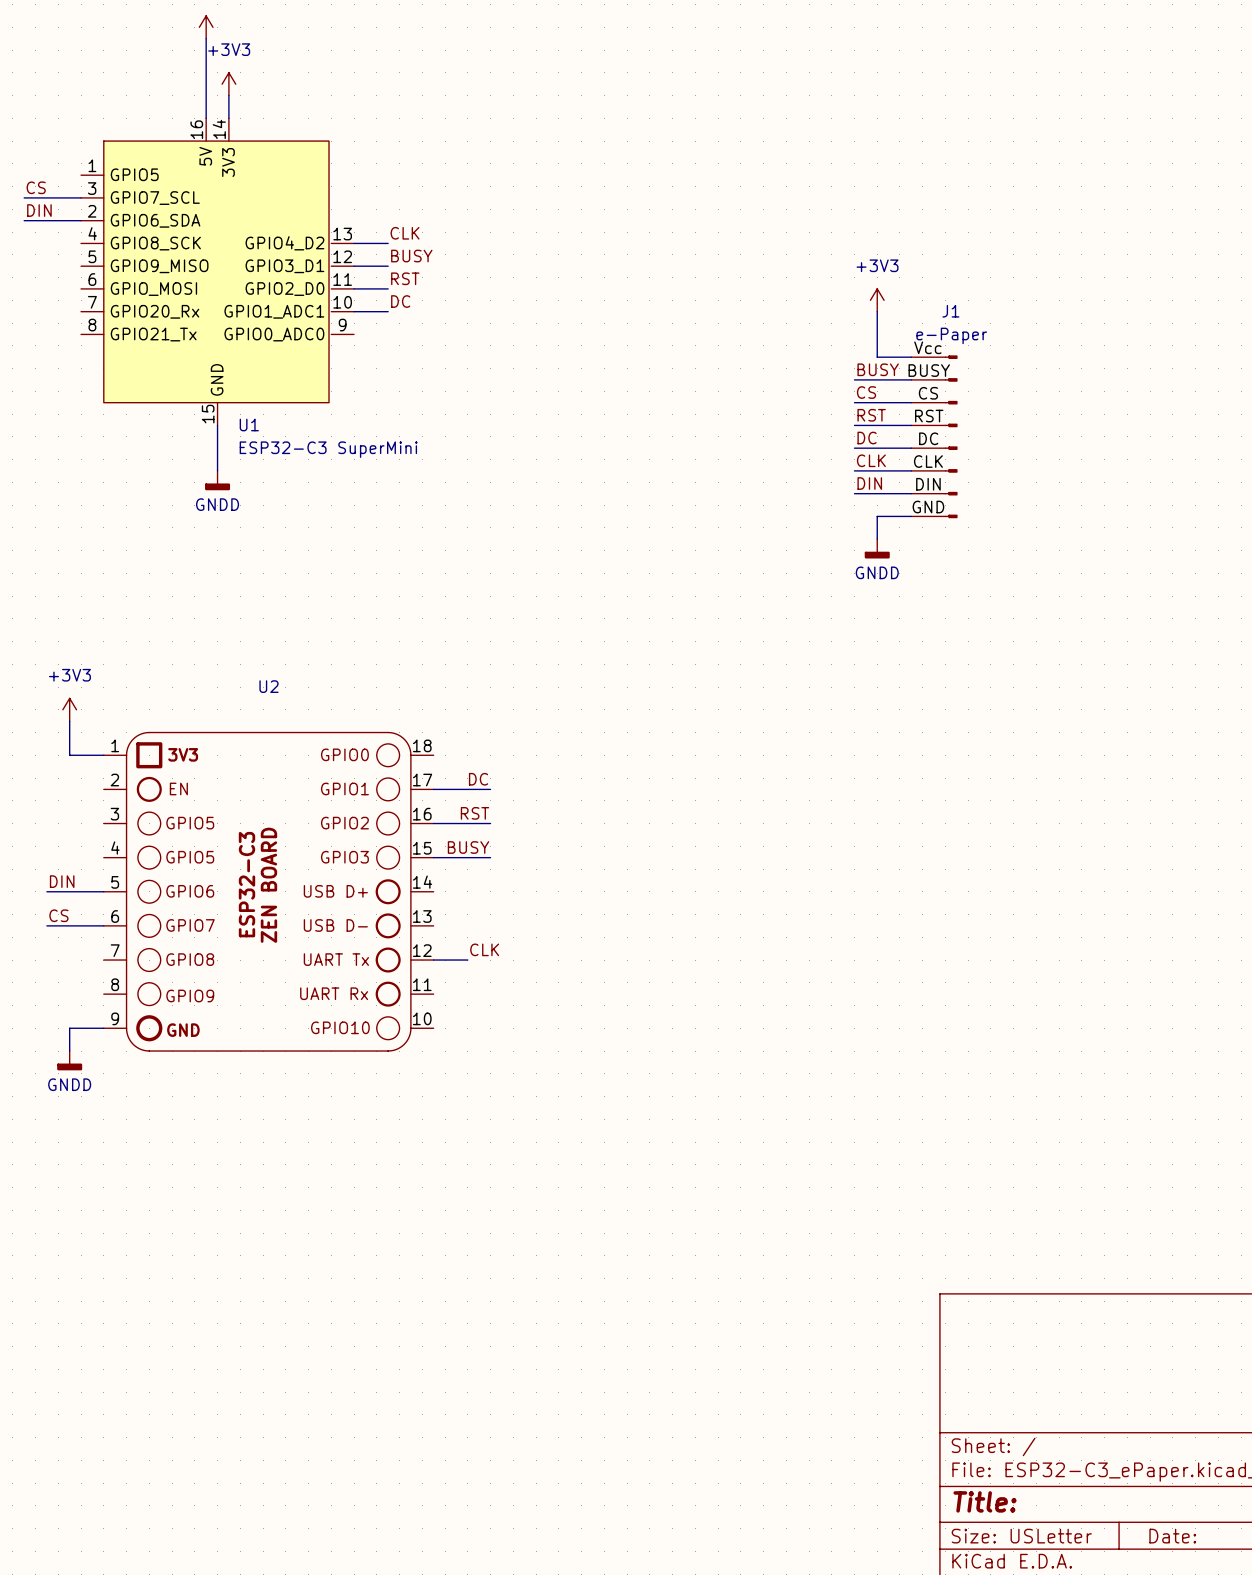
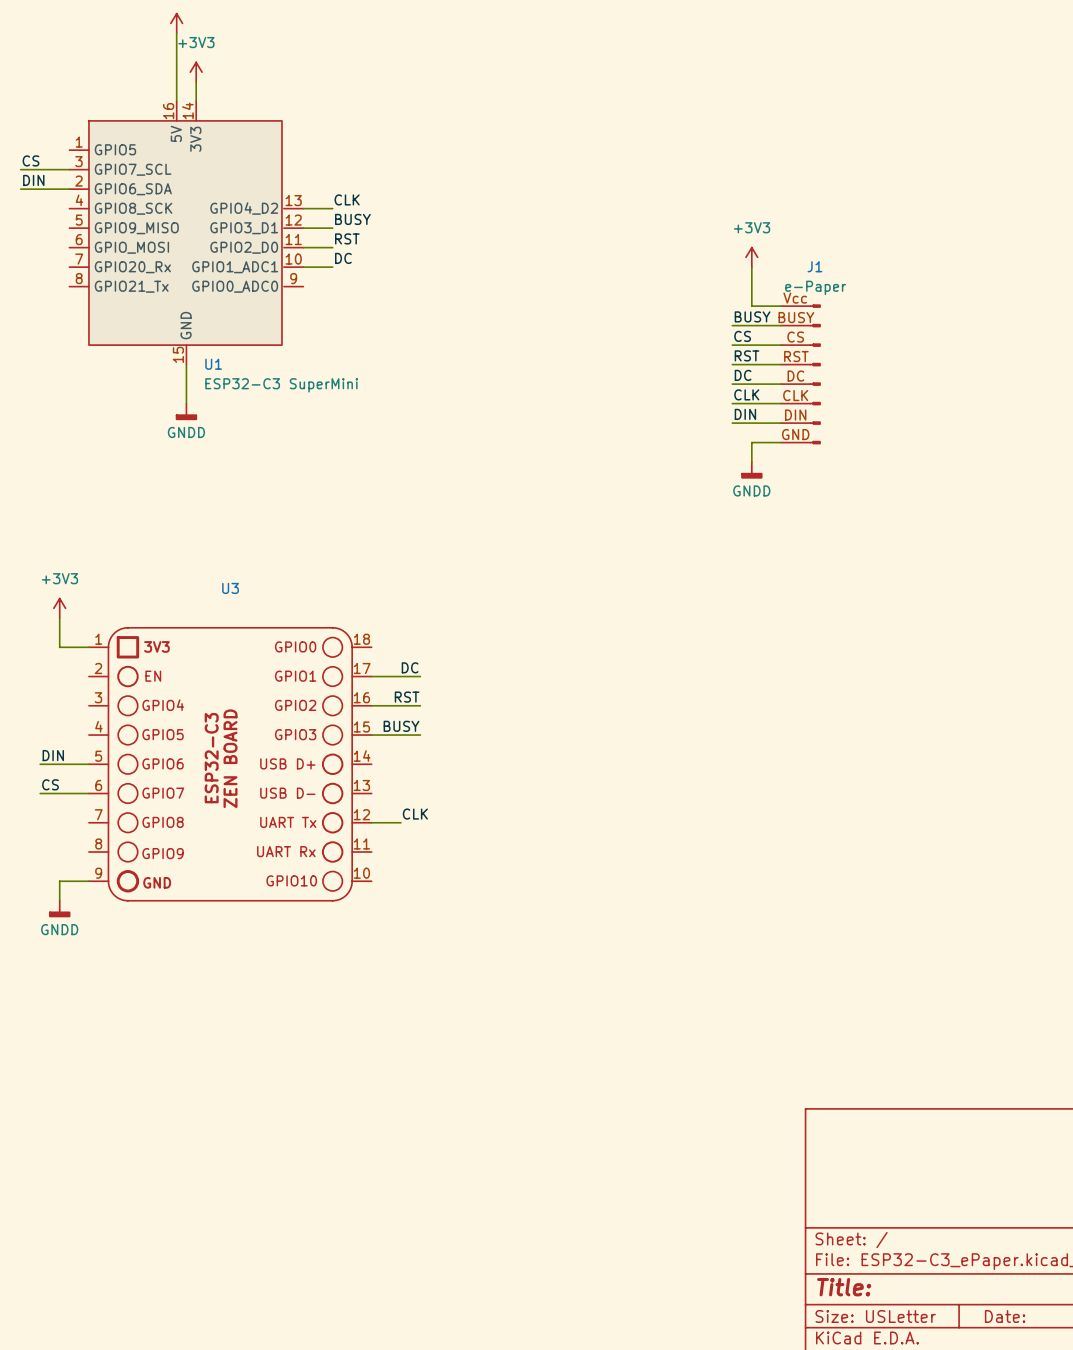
U2 name: U2 (268, 686) -> U3 (230, 588)
U2 text: GPIO5 (190, 823) -> GPIO4 (163, 705)

